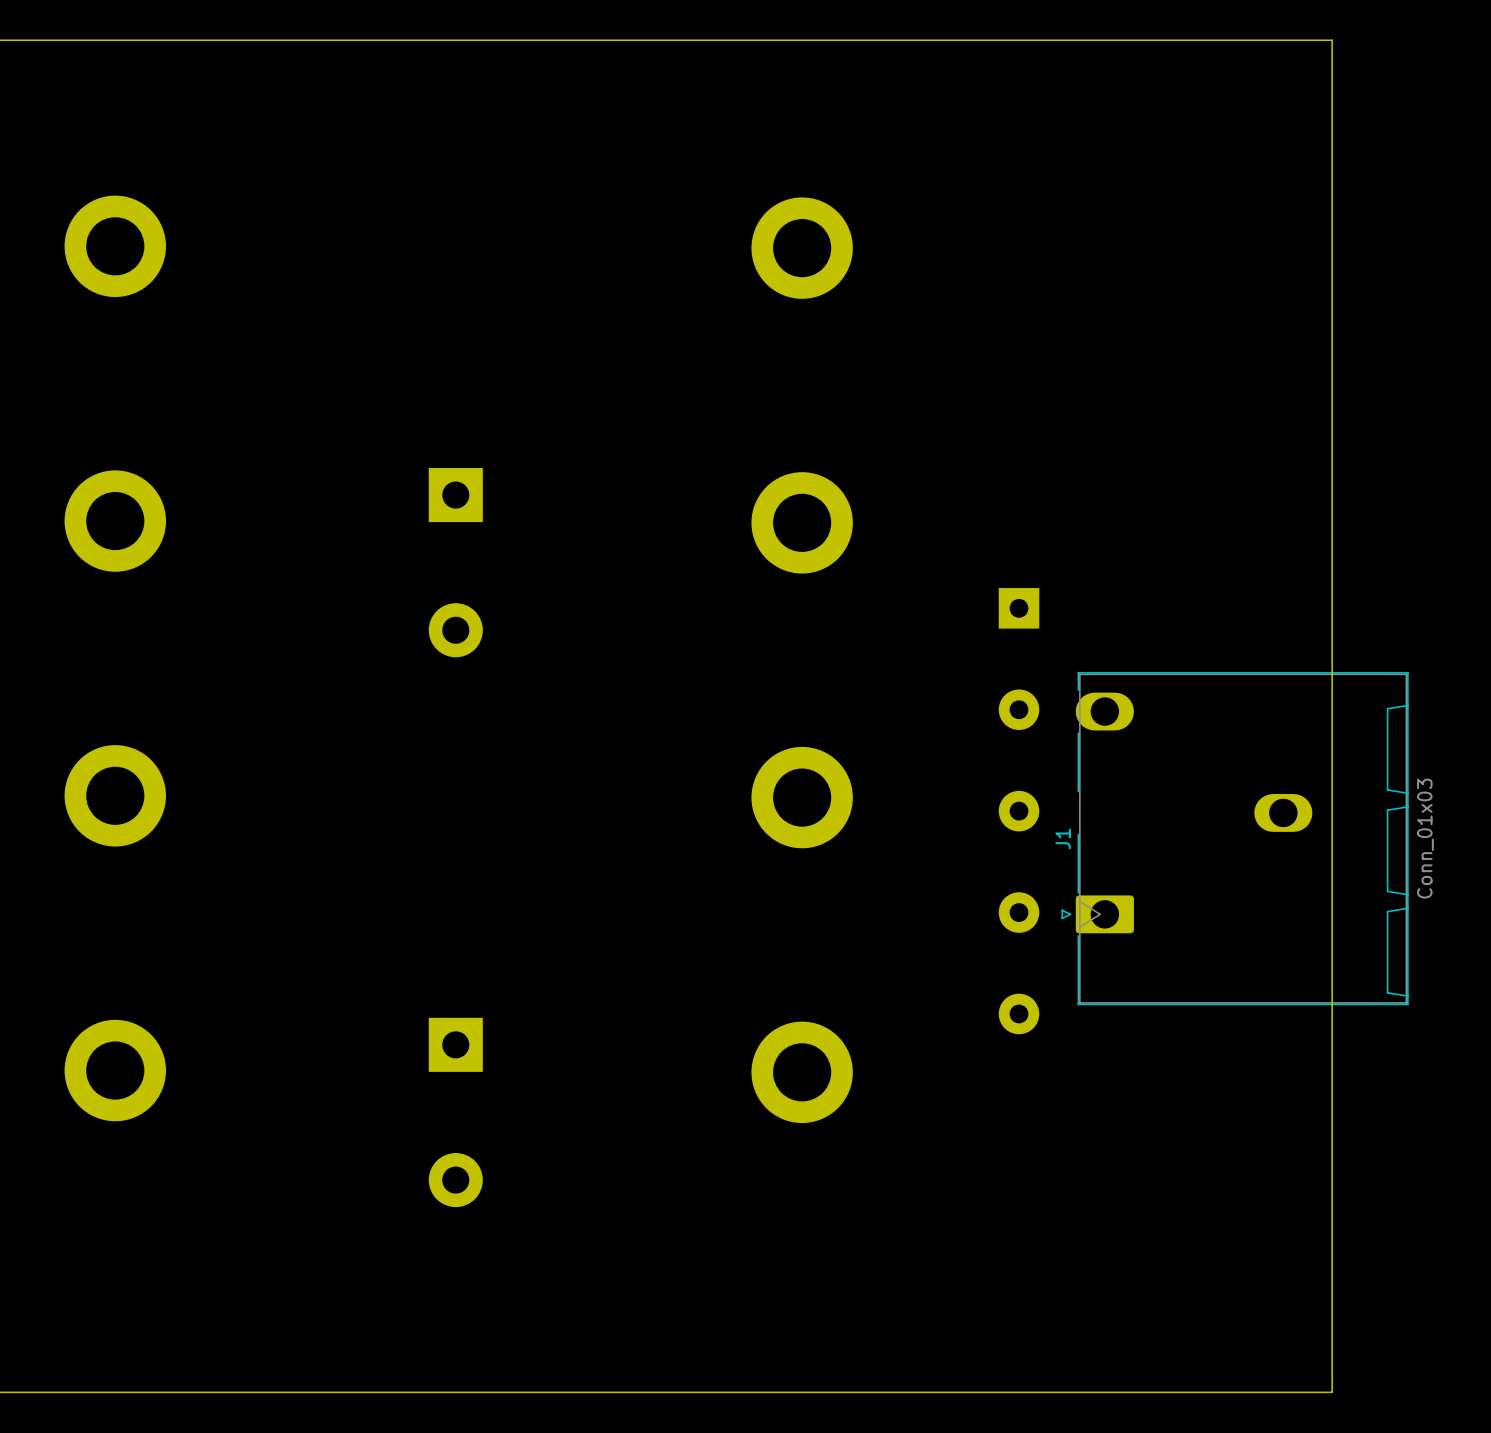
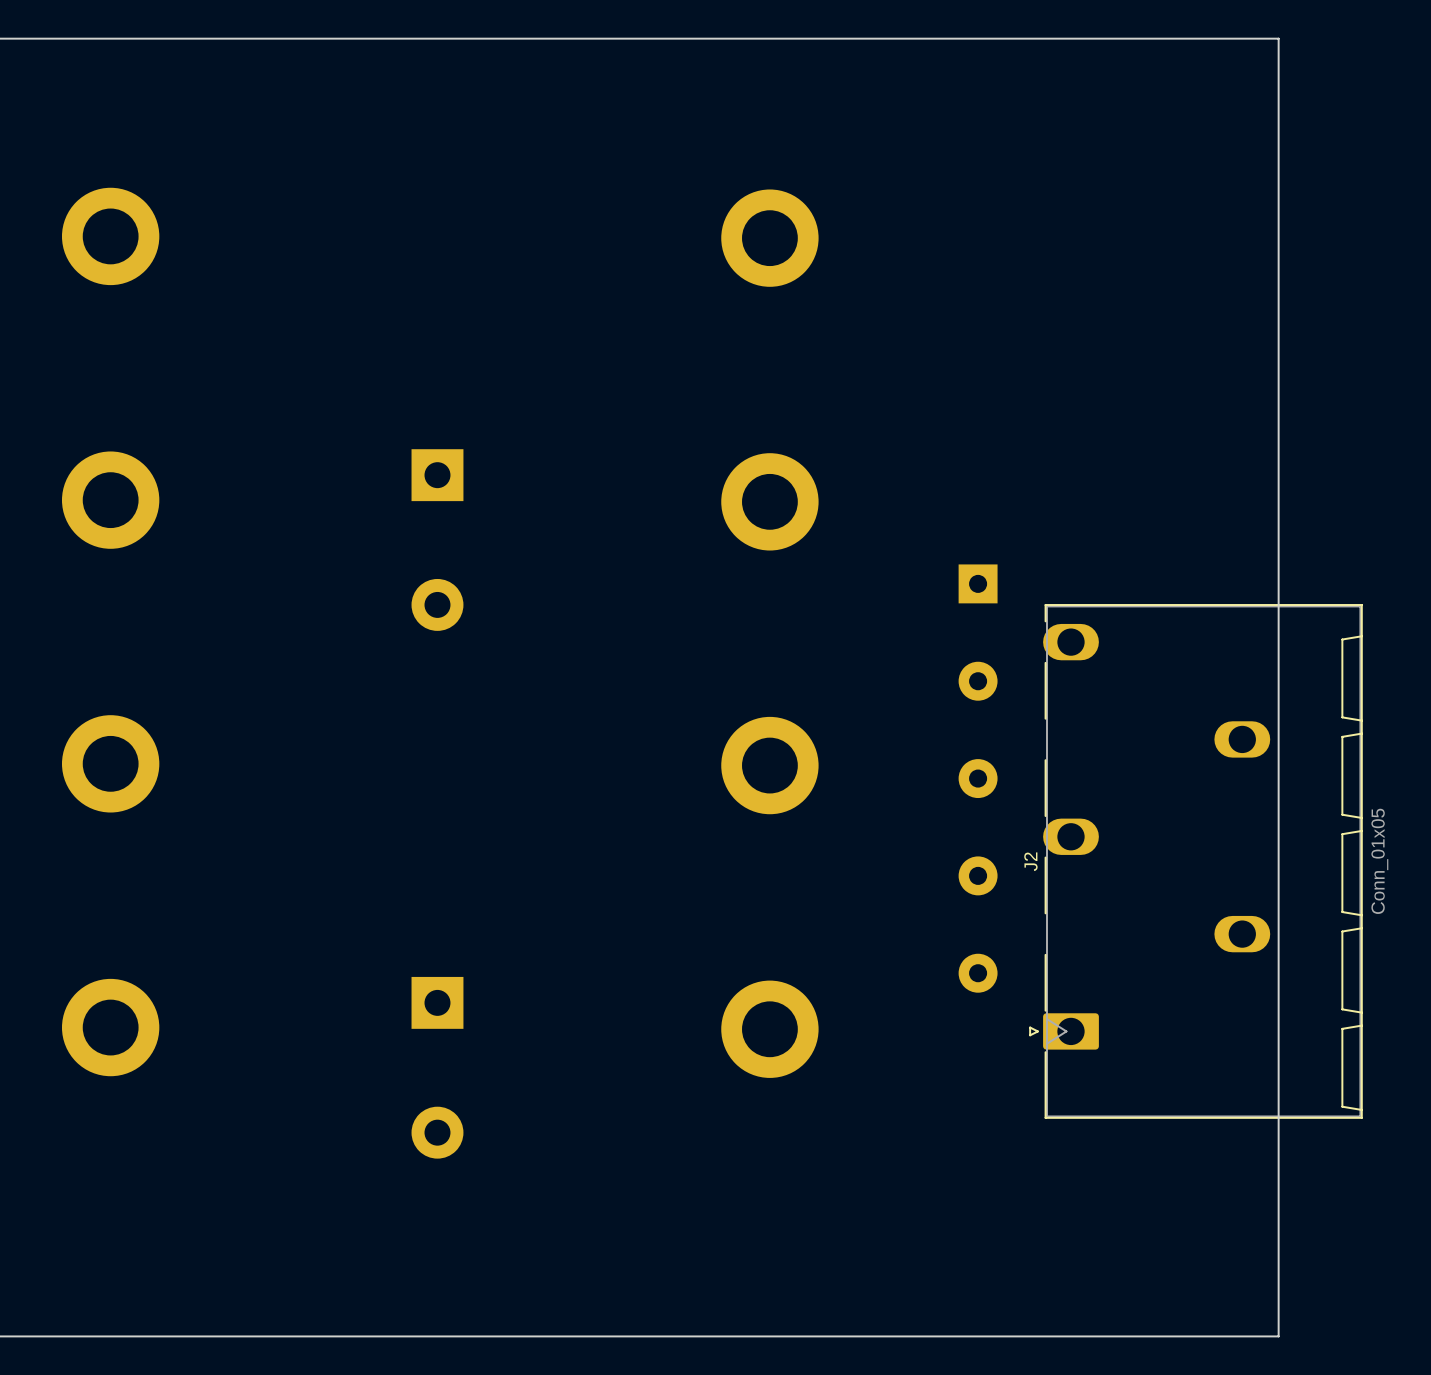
J1: Conn_01x03 (1235, 838) -> none
J2: none -> Conn_01x05 (1195, 861)

